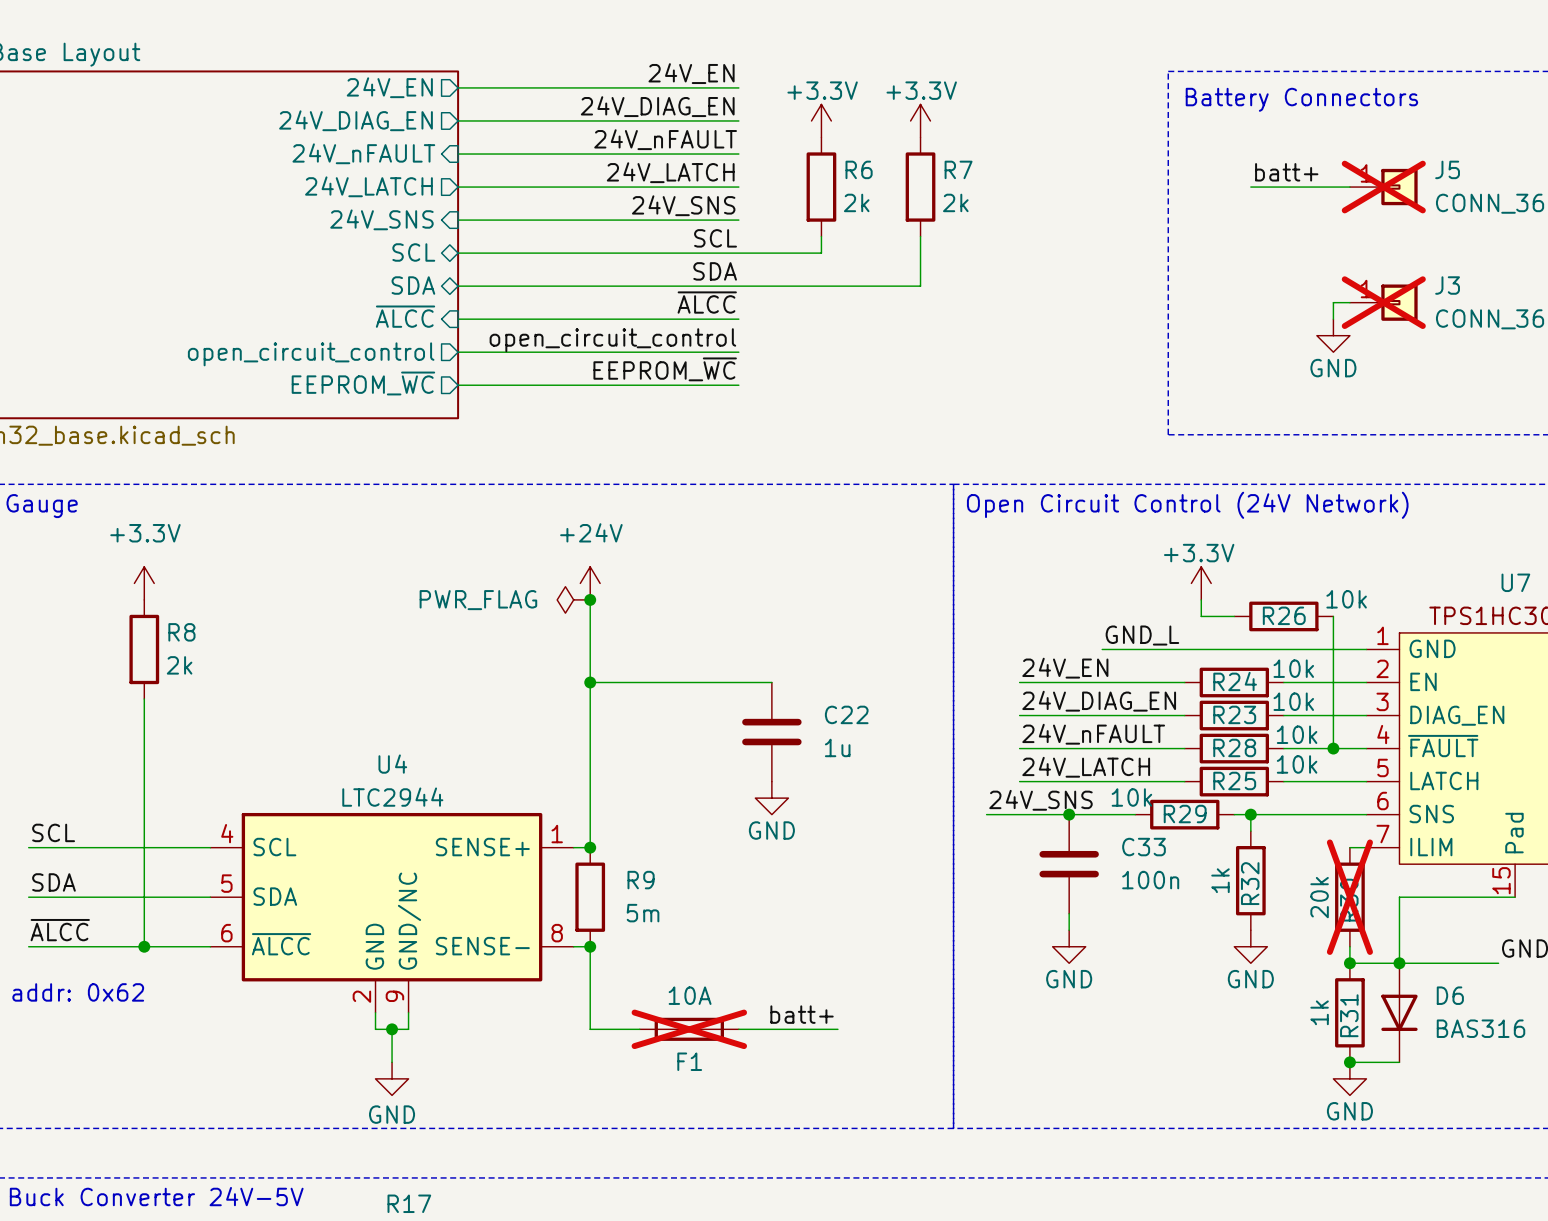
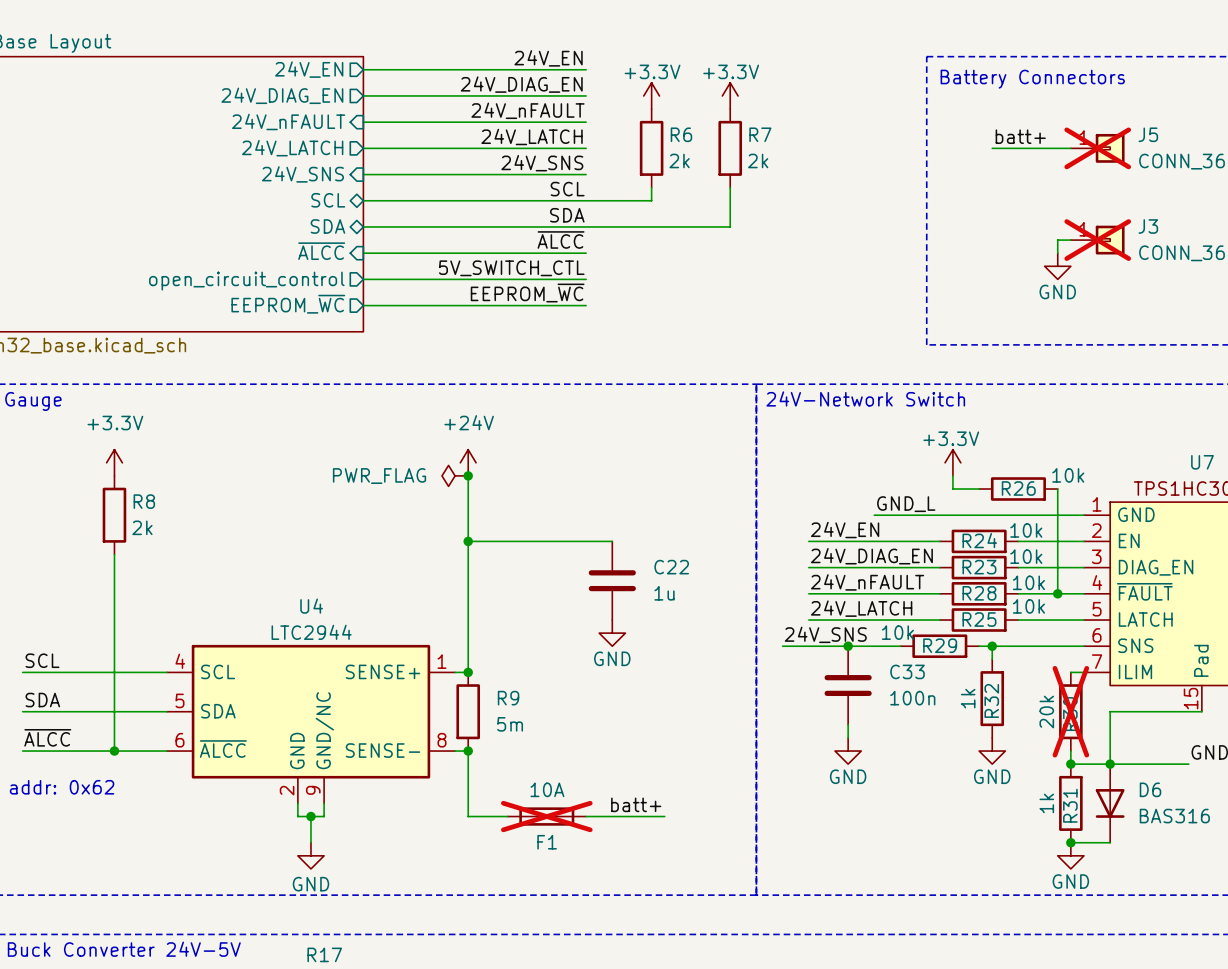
label: open_circuit_control (612, 340) -> 5V_SWITCH_CTL (511, 268)
text: Open Circuit Control (24V Network) (1187, 505) -> 24V-Network Switch (865, 398)

